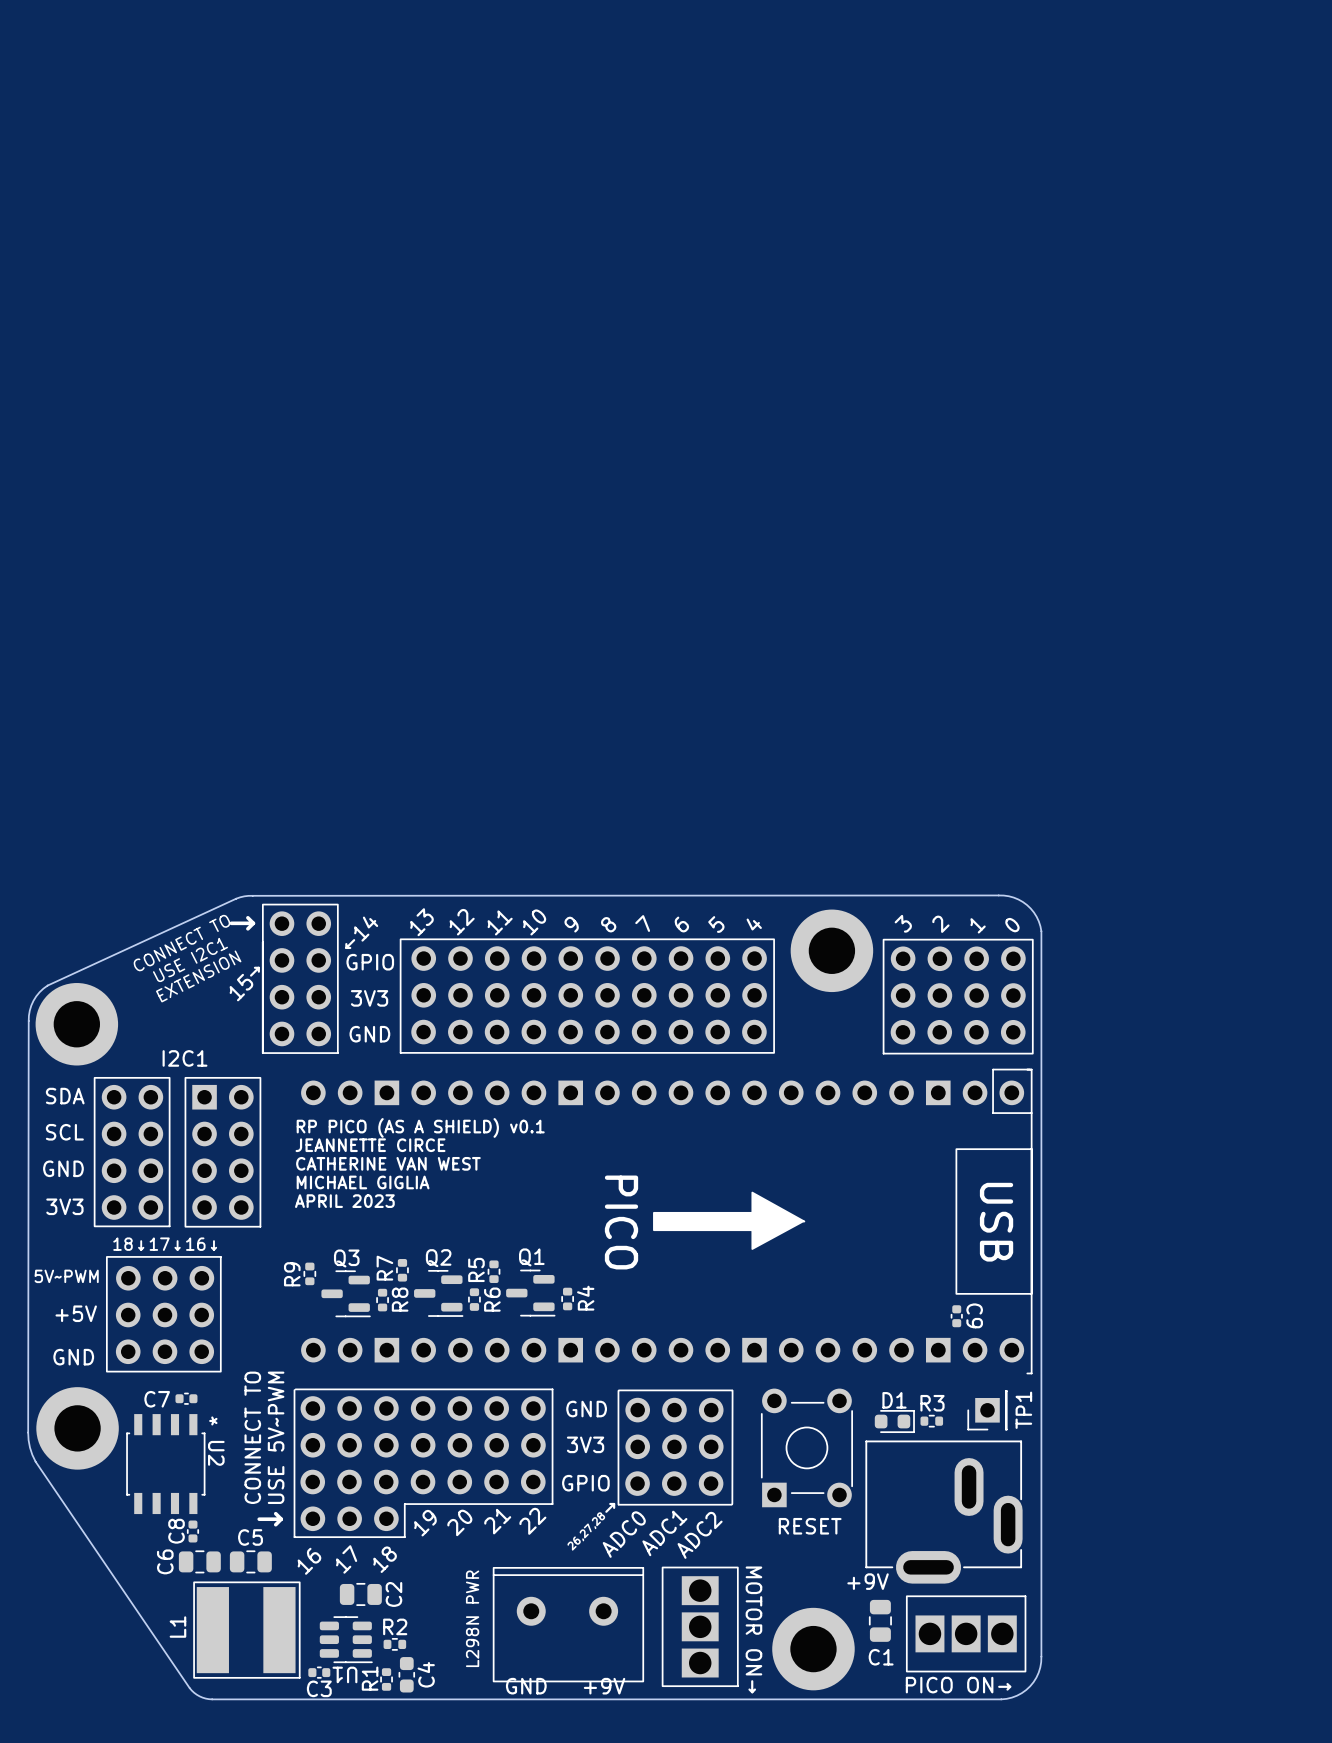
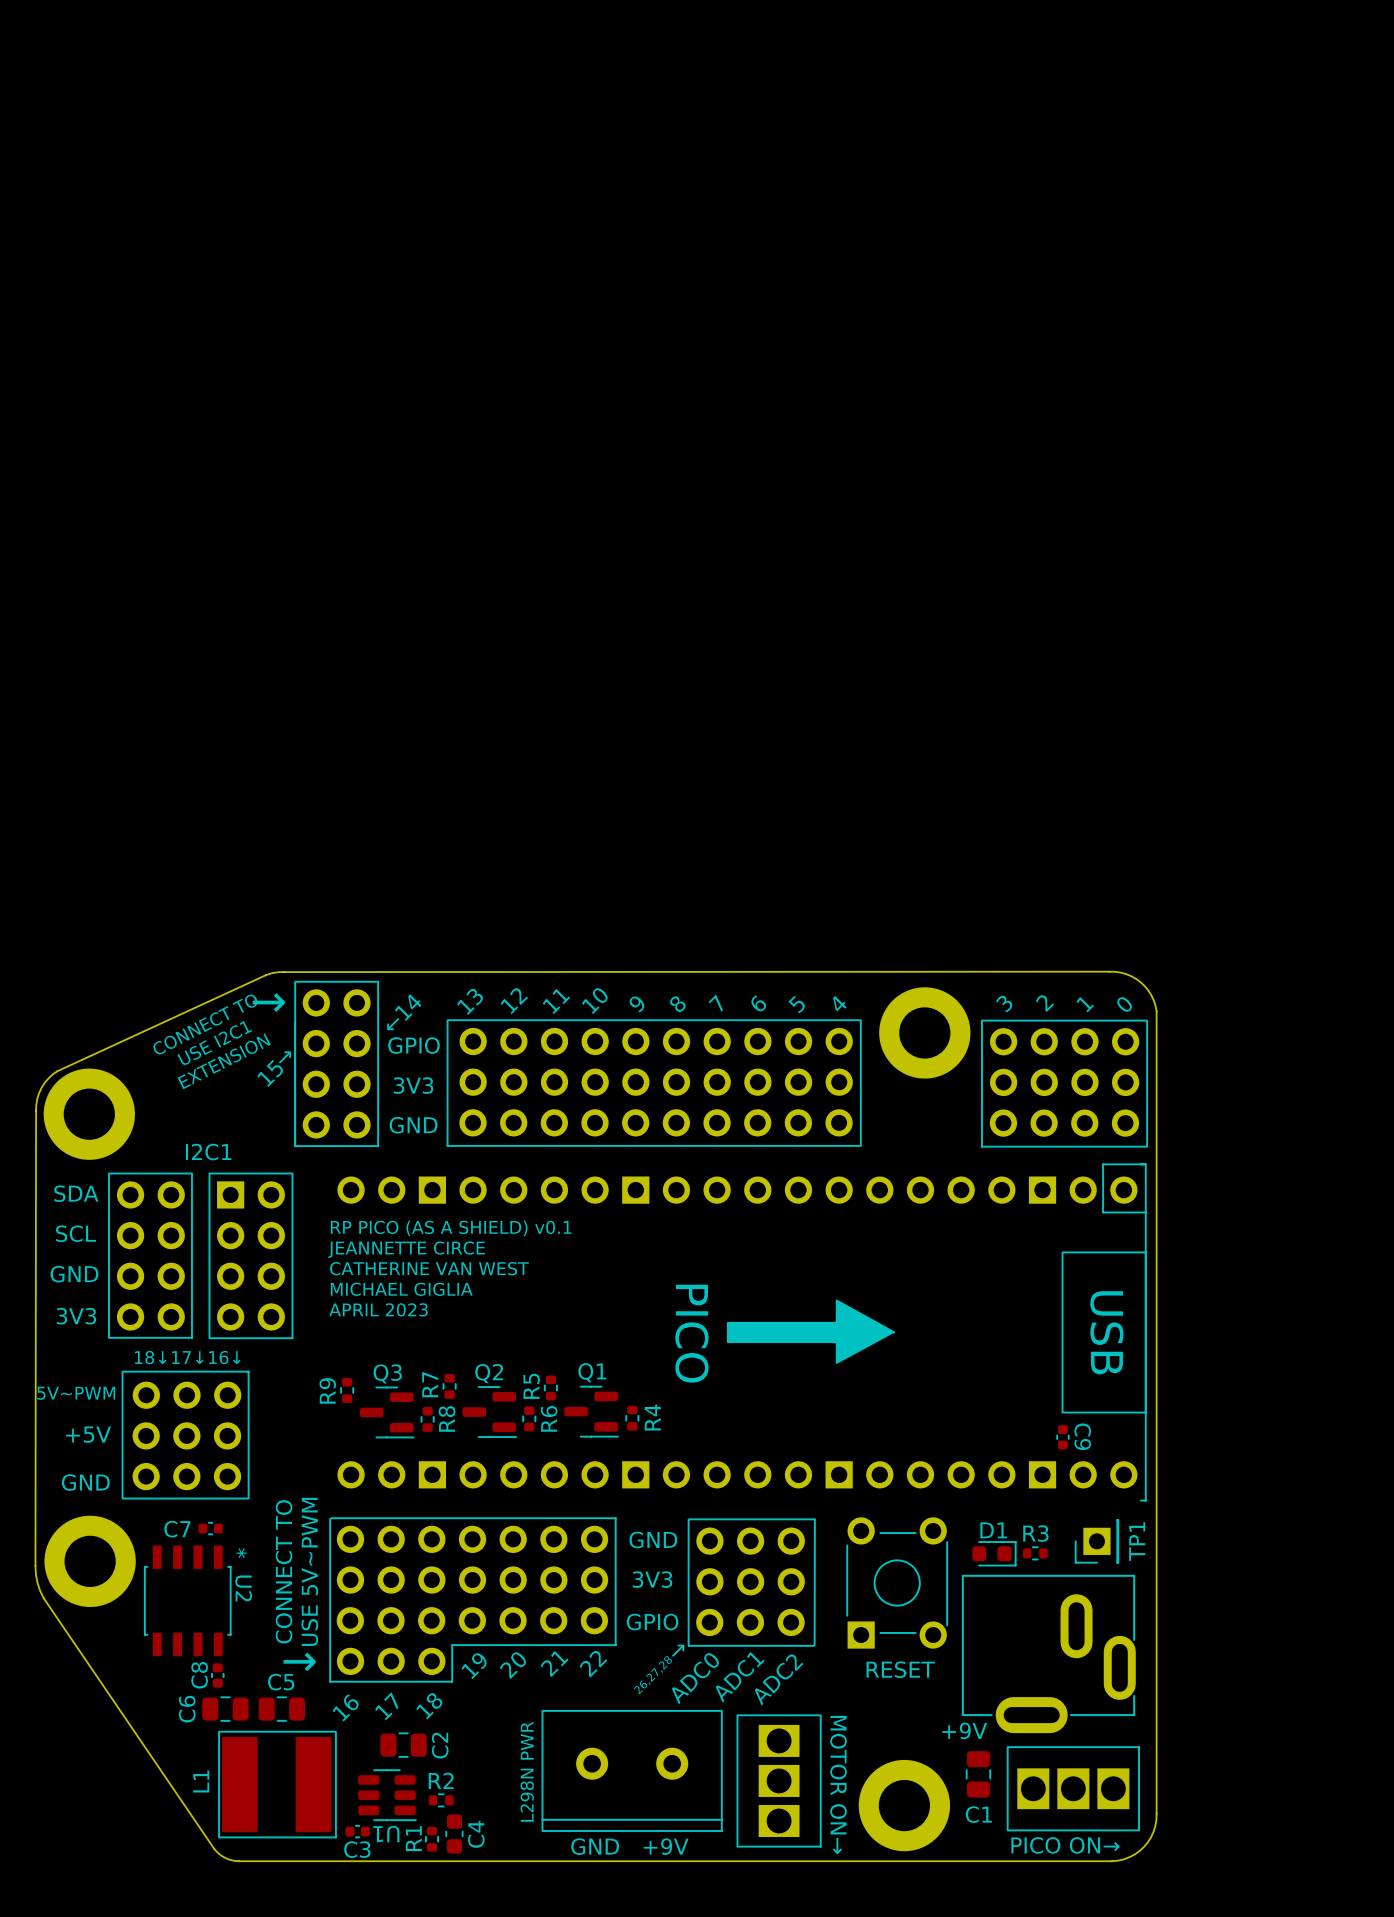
part footprint: [492, 1566, 645, 1683] -> [541, 1709, 723, 1832]

